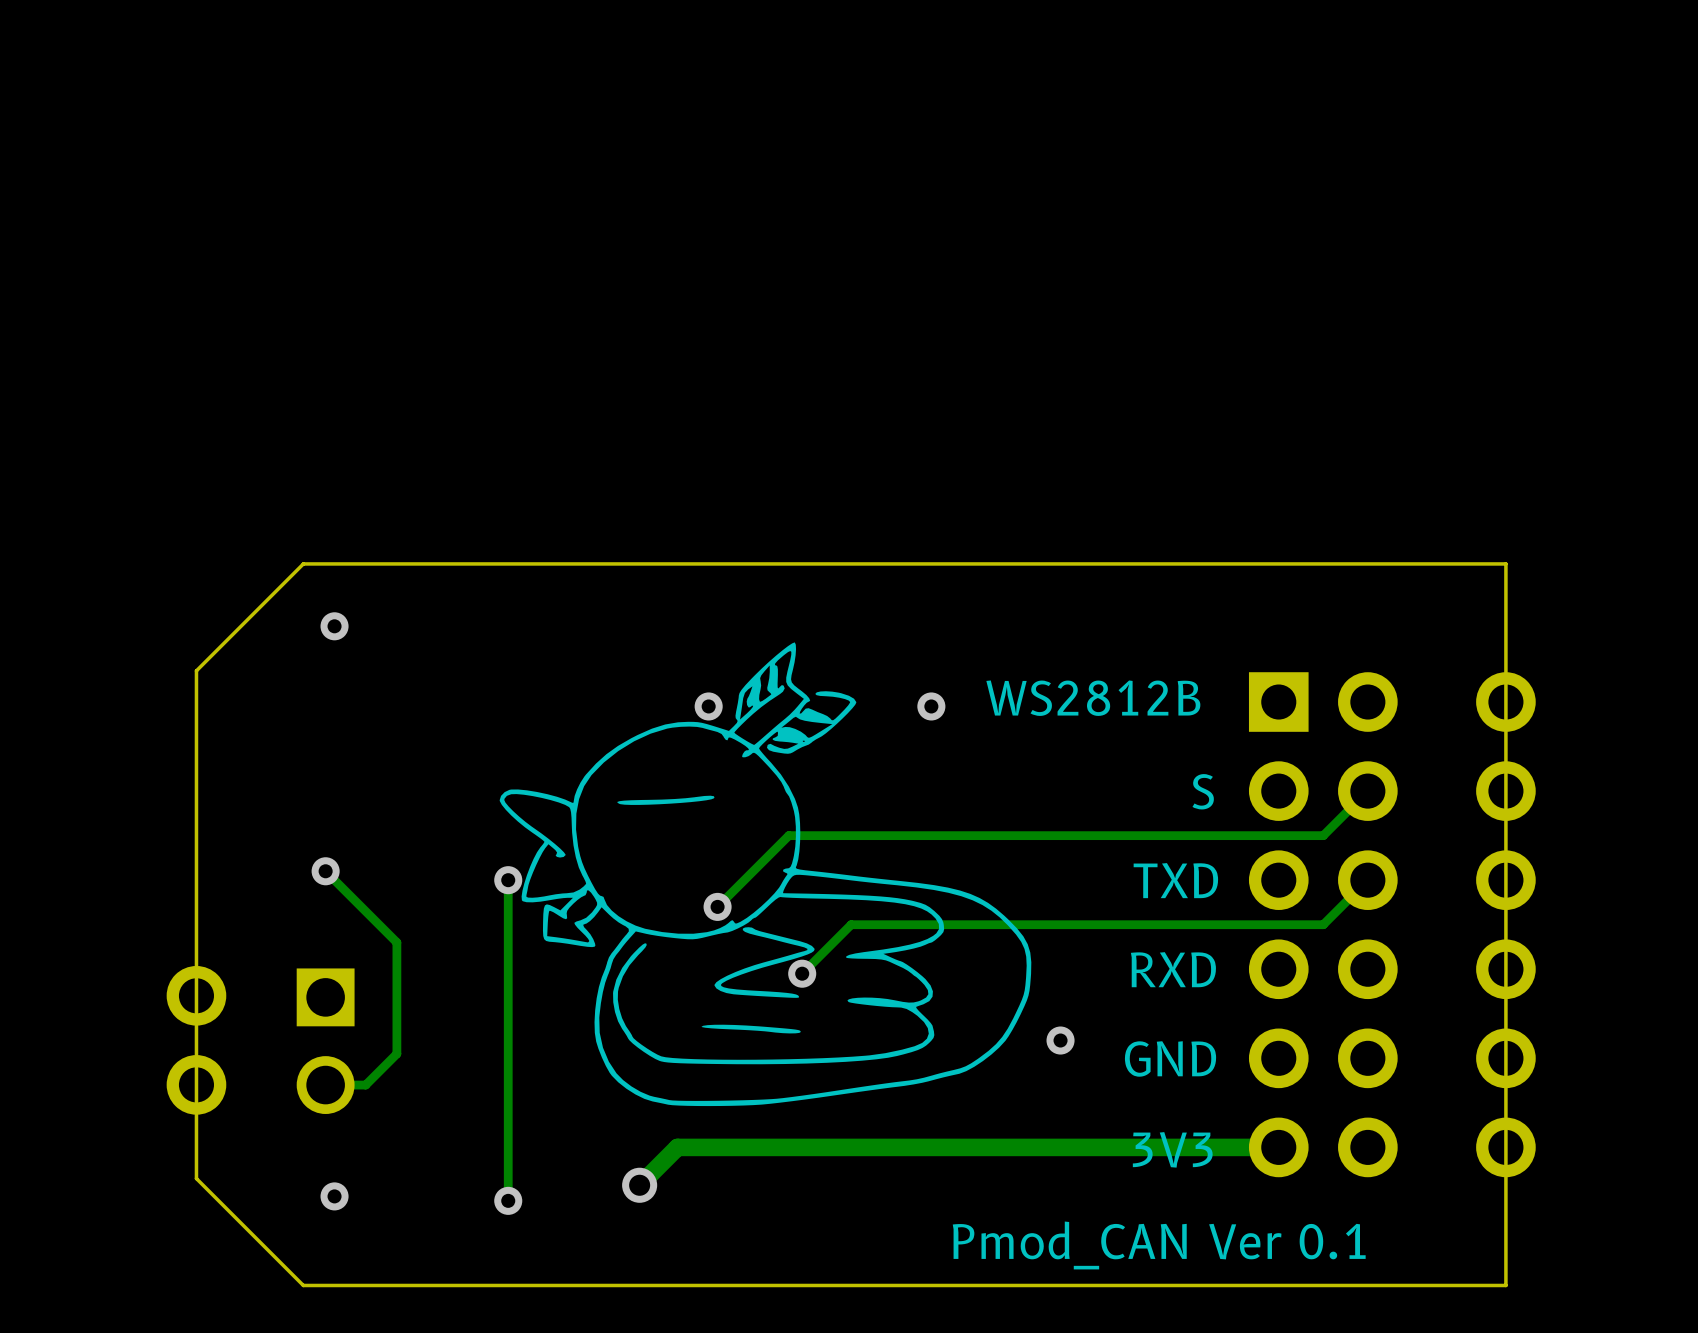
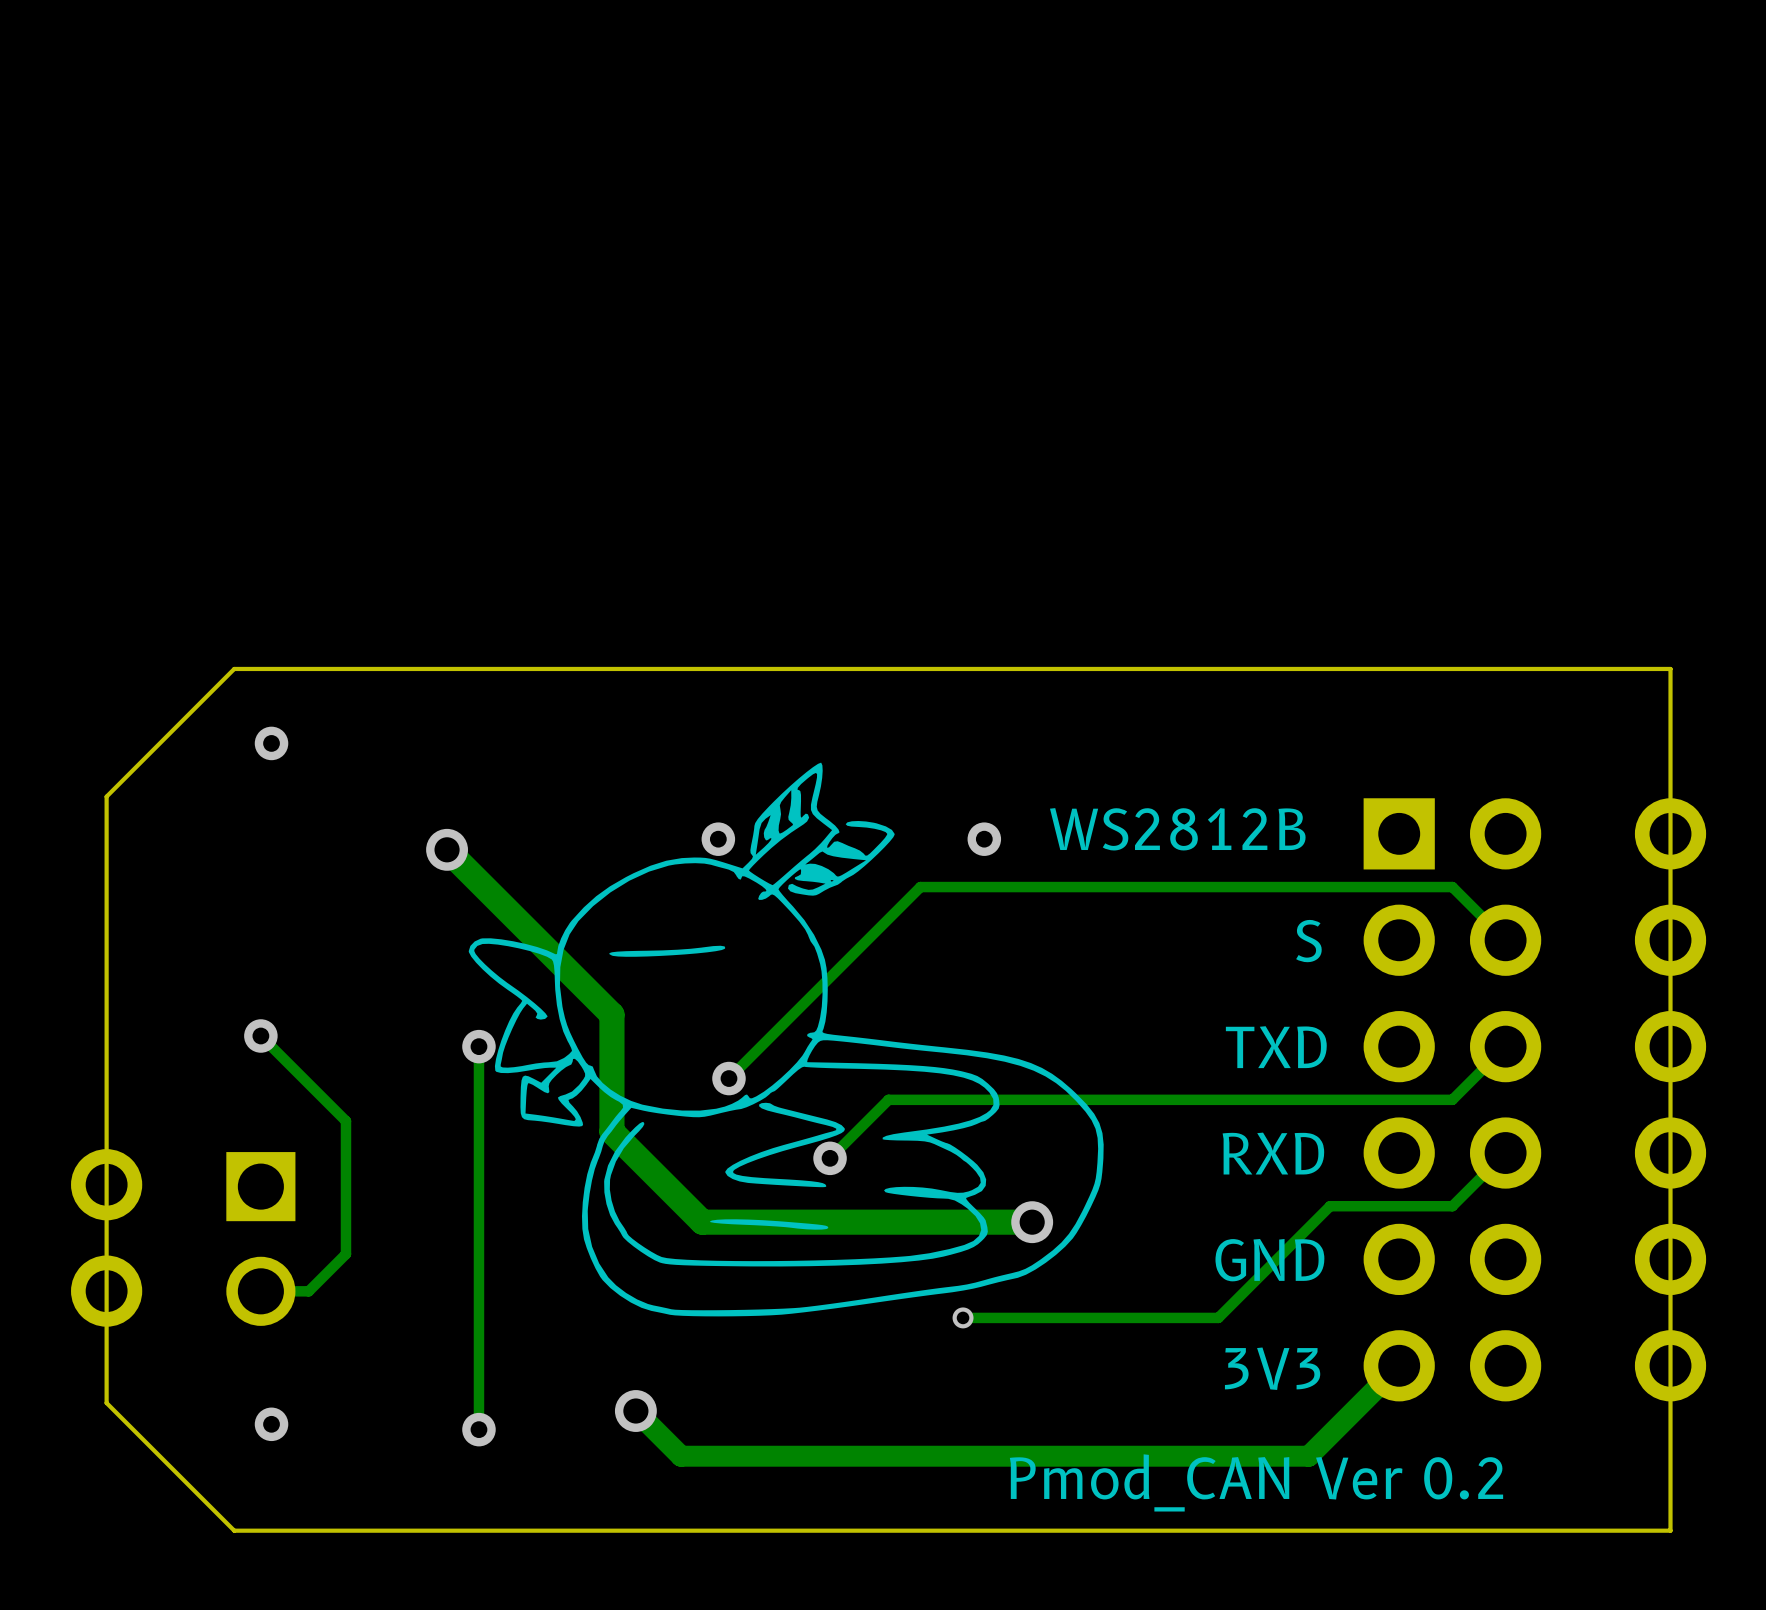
track: none -> (447, 849) (611, 1014) (611, 1131) (702, 1222) (1032, 1222)
via: none -> (447, 849)
track: (1367, 791) (1323, 835) (788, 835) -> (1505, 940) (1452, 887) (920, 887) (814, 993)
track: none -> (1505, 1153) (1452, 1206) (1330, 1206) (1218, 1317) (963, 1317)
via: none -> (1032, 1222)
via: (1060, 1040) -> none
via: none -> (963, 1317)
track: (1278, 1147) (677, 1147) (639, 1185) -> (1399, 1365) (1308, 1456) (681, 1456) (635, 1411)
text: Pmod_CAN Ver 0.1 (1159, 1245) -> Pmod_CAN Ver 0.2 (1256, 1482)

